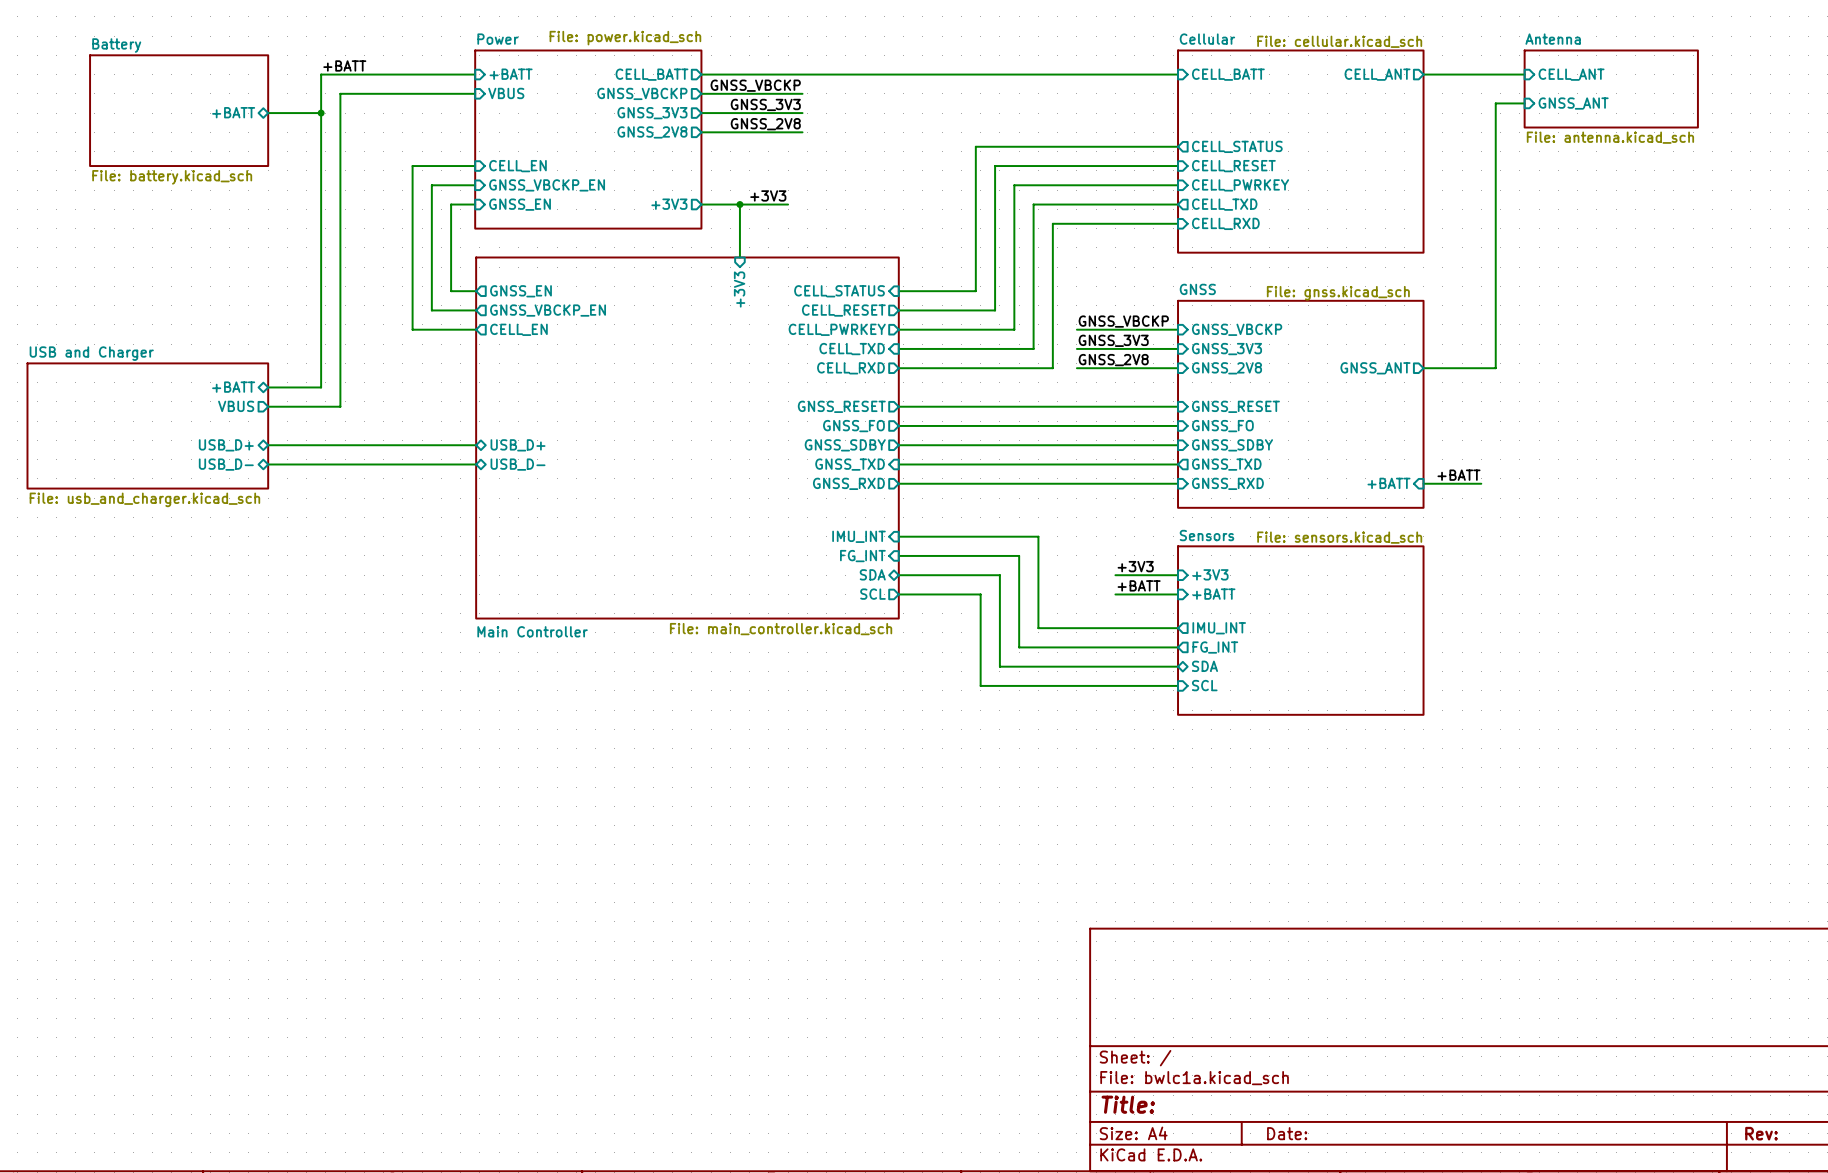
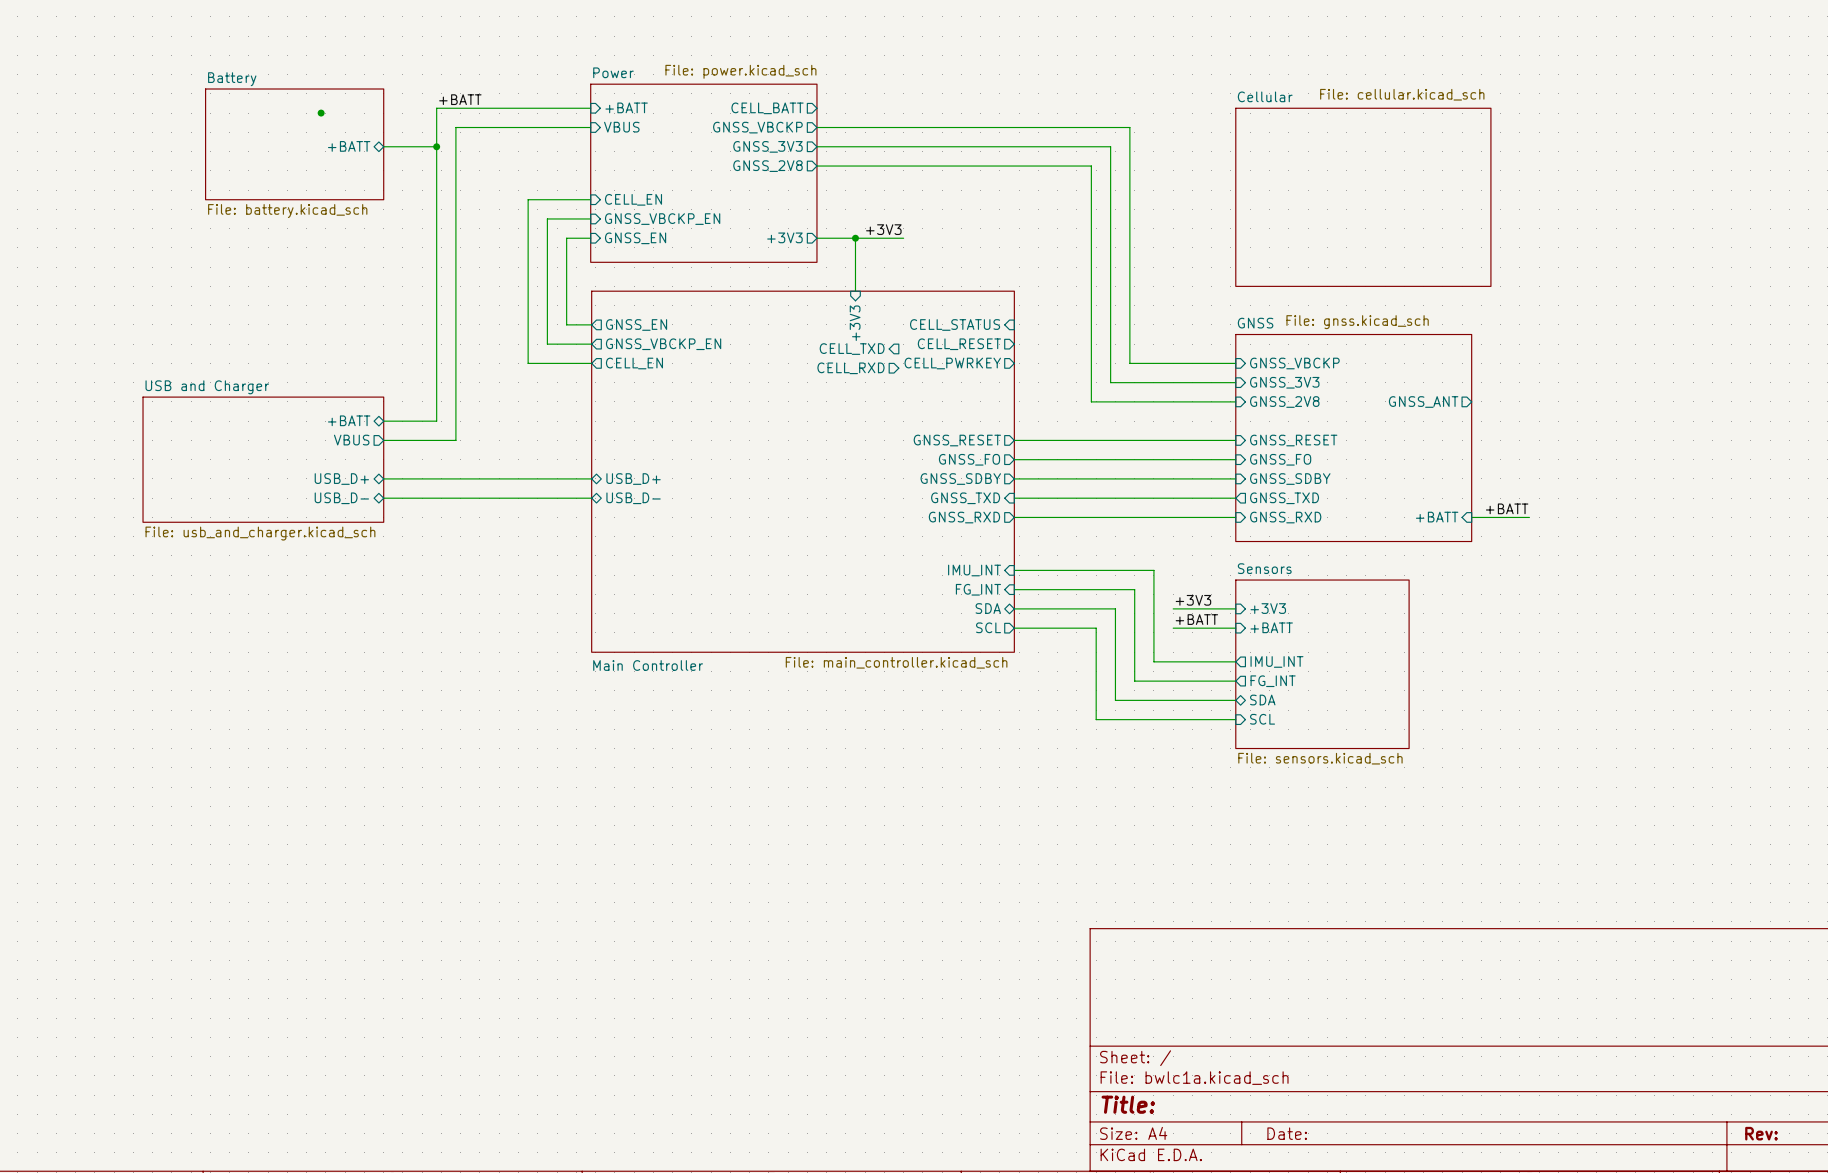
label position: +BATT (344, 65) -> +BATT (460, 99)
wire: (475, 74) (321, 74) (321, 387) (268, 387) -> (590, 108) (436, 108) (436, 421) (383, 421)
sheet pin: +BATT (511, 74) -> none
sheet pin position: CELL_BATT (652, 74) -> CELL_BATT (767, 108)
wire: (701, 74) (1178, 74) -> none
sheet pin: CELL_BATT (1228, 74) -> none
sheet pin: CELL_ANT (1377, 74) -> none
wire: (1423, 74) (1524, 74) -> none
sheet pin: CELL_ANT (1571, 74) -> none
label: GNSS_VBCKP (755, 85) -> none
sheet Antenna: File: antenna.kicad_sch (1611, 89) -> none
wire: (475, 93) (340, 93) (340, 406) (268, 406) -> (590, 127) (455, 127) (455, 440) (383, 440)
sheet pin position: VBUS (506, 93) -> VBUS (621, 127)
sheet pin position: GNSS_VBCKP (642, 93) -> GNSS_VBCKP (757, 127)
wire: (701, 93) (802, 93) -> none
wire: (1524, 103) (1495, 103) (1495, 368) (1423, 368) -> none
sheet pin: GNSS_ANT (1573, 103) -> none
label: GNSS_3V3 (765, 104) -> none
sheet pin: none -> +BATT (626, 107)
sheet Battery position: (179, 110) -> (294, 144)
sheet pin: +BATT (233, 112) -> none
wire: (268, 113) (321, 113) -> (383, 146) (436, 146)
sheet pin position: GNSS_3V3 (652, 113) -> GNSS_3V3 (767, 146)
wire: (701, 113) (802, 113) -> none
label: GNSS_2V8 (765, 124) -> none
wire: none -> (816, 127) (1129, 127) (1129, 363) (1235, 363)
sheet pin position: GNSS_2V8 (652, 132) -> GNSS_2V8 (767, 166)
wire: (701, 132) (802, 132) -> none
sheet Power position: (588, 139) -> (703, 173)
sheet pin: none -> +BATT (349, 146)
junction: none -> (436, 146)
wire: (975, 146) (975, 291) (898, 291) -> (975, 146) (816, 146)
wire: (1110, 146) (1178, 146) -> (1110, 146) (1110, 382) (1235, 382)
sheet pin: CELL_STATUS (1237, 146) -> none
sheet Cellular: File: cellular.kicad_sch (1300, 151) -> none
wire: (475, 166) (412, 166) (412, 329) (476, 329) -> (590, 199) (528, 199) (528, 363) (591, 363)
sheet pin: CELL_EN (517, 166) -> none
wire: (995, 166) (995, 310) (898, 310) -> (995, 166) (816, 166)
wire: (1091, 166) (1178, 166) -> (1091, 166) (1091, 401) (1235, 401)
sheet pin: CELL_RESET (1233, 166) -> none
wire: (475, 185) (431, 185) (431, 310) (476, 310) -> (590, 218) (547, 218) (547, 344) (591, 344)
sheet pin: GNSS_VBCKP_EN (547, 185) -> none
wire: (1178, 185) (1014, 185) (1014, 329) (898, 329) -> none
sheet pin: CELL_PWRKEY (1240, 185) -> none
label position: +3V3 (768, 195) -> +3V3 (883, 229)
sheet Cellular: none -> File: cellular.kicad_sch (1363, 197)
sheet pin: none -> CELL_EN (633, 199)
wire: (475, 204) (451, 204) (451, 291) (476, 291) -> (590, 238) (566, 238) (566, 324) (591, 324)
sheet pin: GNSS_EN (520, 204) -> none
sheet pin: +3V3 (669, 204) -> none
wire: (701, 204) (788, 204) -> (816, 238) (903, 238)
wire: (739, 204) (739, 257) -> (855, 238) (855, 291)
junction: (739, 204) -> none
wire: (1178, 204) (1033, 204) (1033, 348) (898, 348) -> none
sheet pin: CELL_TXD (1224, 204) -> none
sheet pin: none -> GNSS_VBCKP_EN (662, 219)
wire: (1178, 223) (1052, 223) (1052, 368) (898, 368) -> none
sheet pin: CELL_RXD (1225, 223) -> none
sheet pin: none -> +3V3 (784, 237)
sheet pin: none -> GNSS_EN (635, 238)
junction: none -> (855, 238)
sheet pin: +3V3 (739, 289) -> none
sheet pin: GNSS_EN (520, 291) -> none
sheet pin position: CELL_STATUS (839, 291) -> CELL_STATUS (955, 324)
sheet pin: GNSS_VBCKP_EN (548, 310) -> GNSS_EN (636, 324)
sheet pin position: CELL_RESET (843, 310) -> CELL_RESET (959, 344)
label: GNSS_VBCKP (1123, 321) -> none
sheet pin: none -> +3V3 (855, 323)
sheet pin: CELL_EN (518, 329) -> none
sheet pin position: CELL_PWRKEY (837, 329) -> CELL_PWRKEY (952, 363)
wire: (1076, 329) (1178, 329) -> none
sheet pin position: GNSS_VBCKP (1237, 329) -> GNSS_VBCKP (1294, 363)
label: GNSS_3V3 (1113, 340) -> none
sheet pin: none -> GNSS_VBCKP_EN (663, 344)
wire: (1076, 348) (1178, 348) -> none
sheet pin position: GNSS_3V3 (1227, 349) -> GNSS_3V3 (1284, 382)
label: GNSS_2V8 (1113, 360) -> none
sheet pin: none -> CELL_EN (634, 363)
wire: (1076, 368) (1178, 368) -> none
sheet pin position: GNSS_2V8 (1227, 368) -> GNSS_2V8 (1284, 402)
sheet pin position: GNSS_ANT (1375, 368) -> GNSS_ANT (1423, 402)
sheet pin position: +BATT (233, 387) -> +BATT (349, 420)
sheet GNSS: File: gnss.kicad_sch (1300, 404) -> none
sheet pin position: VBUS (236, 406) -> VBUS (351, 440)
sheet pin: GNSS_RESET (841, 406) -> none
wire: (898, 406) (1178, 406) -> none
sheet pin position: GNSS_RESET (1235, 406) -> GNSS_RESET (1293, 440)
sheet USB and Charger position: (147, 425) -> (263, 459)
wire: (898, 425) (1178, 425) -> none
sheet pin: GNSS_FO (853, 426) -> none
sheet pin position: GNSS_FO (1222, 426) -> GNSS_FO (1280, 459)
sheet Main Controller position: (687, 438) -> (803, 471)
sheet GNSS: none -> File: gnss.kicad_sch (1353, 438)
sheet pin: none -> GNSS_RESET (957, 440)
wire: none -> (1014, 440) (1235, 440)
sheet pin: USB_D+ (226, 445) -> none
wire: (268, 445) (476, 445) -> (383, 478) (591, 478)
sheet pin: USB_D+ (518, 445) -> none
sheet pin: GNSS_SDBY (845, 445) -> none
wire: (898, 445) (1178, 445) -> none
sheet pin position: GNSS_SDBY (1232, 445) -> GNSS_SDBY (1290, 479)
sheet pin: none -> GNSS_FO (969, 459)
wire: none -> (1014, 459) (1235, 459)
sheet pin: USB_D- (226, 464) -> none
wire: (268, 464) (476, 464) -> (383, 498) (591, 498)
sheet pin: USB_D- (518, 464) -> none
sheet pin: GNSS_TXD (850, 464) -> none
wire: (898, 464) (1178, 464) -> none
sheet pin position: GNSS_TXD (1226, 464) -> GNSS_TXD (1284, 498)
label position: +BATT (1458, 475) -> +BATT (1507, 508)
wire: none -> (1014, 478) (1235, 478)
sheet pin: none -> USB_D+ (341, 479)
sheet pin: none -> USB_D+ (633, 479)
sheet pin: none -> GNSS_SDBY (960, 479)
sheet pin: GNSS_RXD (848, 483) -> none
wire: (898, 483) (1178, 483) -> none
sheet pin position: GNSS_RXD (1227, 483) -> GNSS_RXD (1285, 517)
sheet pin position: +BATT (1389, 483) -> +BATT (1437, 517)
wire: (1423, 483) (1481, 483) -> (1471, 517) (1529, 517)
sheet pin: none -> USB_D- (341, 498)
sheet pin: none -> USB_D- (633, 498)
sheet pin: none -> GNSS_TXD (965, 498)
wire: none -> (1014, 498) (1235, 498)
sheet pin: none -> GNSS_RXD (964, 517)
wire: none -> (1014, 517) (1235, 517)
sheet pin: IMU_INT (859, 536) -> none
wire: (898, 536) (1038, 536) (1038, 628) -> (1014, 628) (1038, 628)
wire: (898, 555) (1019, 555) (1019, 647) (1178, 647) -> none
sheet pin: FG_INT (862, 556) -> none
label position: +3V3 (1135, 566) -> +3V3 (1193, 600)
sheet pin: none -> IMU_INT (974, 570)
wire: none -> (1014, 570) (1153, 570) (1153, 661) (1235, 661)
sheet pin: SDA (872, 574) -> none
sheet pin position: +3V3 (1210, 574) -> +3V3 (1268, 608)
wire: (898, 575) (999, 575) (999, 666) (1178, 666) -> none
wire: (1115, 575) (1178, 575) -> none
label position: +BATT (1139, 585) -> +BATT (1196, 619)
sheet pin: none -> FG_INT (978, 589)
wire: none -> (1014, 589) (1134, 589) (1134, 681) (1235, 681)
sheet pin: SCL (872, 594) -> none
wire: (898, 594) (980, 594) (980, 685) (1178, 685) -> none
wire: (1115, 594) (1178, 594) -> (1173, 608) (1235, 608)
sheet pin position: +BATT (1213, 594) -> +BATT (1271, 627)
sheet pin: none -> SDA (988, 608)
wire: none -> (1014, 608) (1115, 608) (1115, 700) (1235, 700)
sheet pin: none -> SCL (988, 627)
wire: (1096, 628) (1173, 628) -> (1096, 628) (1096, 719) (1235, 719)
wire: none -> (1178, 628) (1235, 628)
sheet pin position: IMU_INT (1219, 628) -> IMU_INT (1276, 661)
sheet Sensors: File: sensors.kicad_sch (1300, 630) -> none
sheet pin position: FG_INT (1215, 647) -> FG_INT (1273, 681)
sheet Sensors: none -> File: sensors.kicad_sch (1322, 664)
sheet pin position: SDA (1204, 666) -> SDA (1262, 700)
sheet pin position: SCL (1204, 685) -> SCL (1262, 719)

